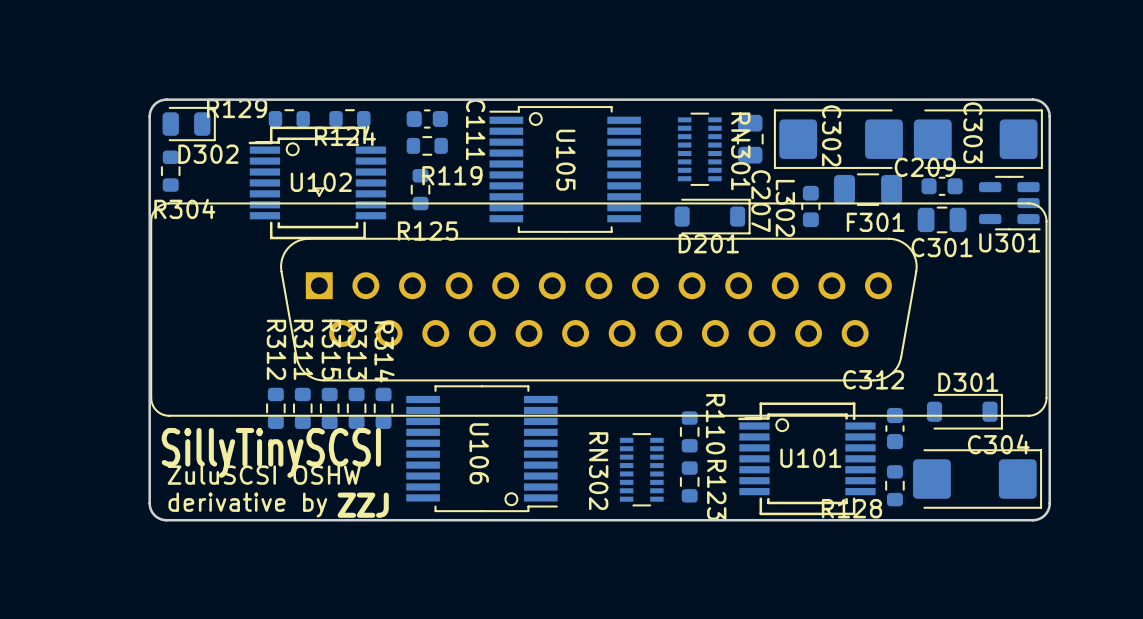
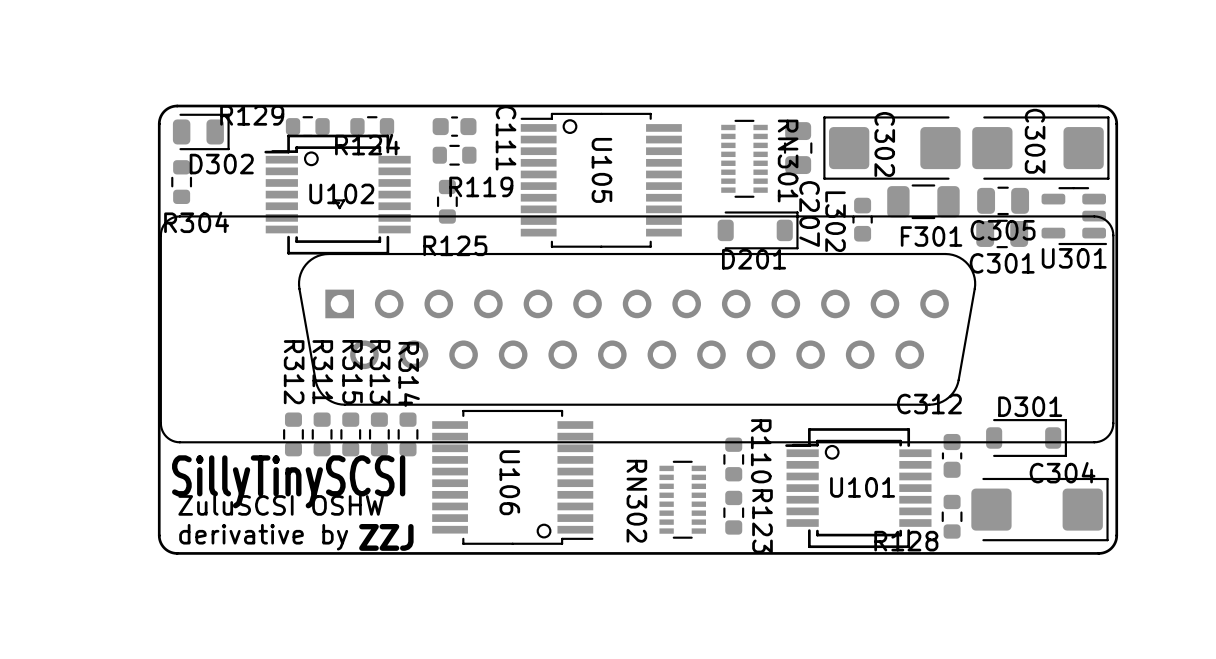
C209: (942, 186) -> none
C305: none -> (1003, 200)

